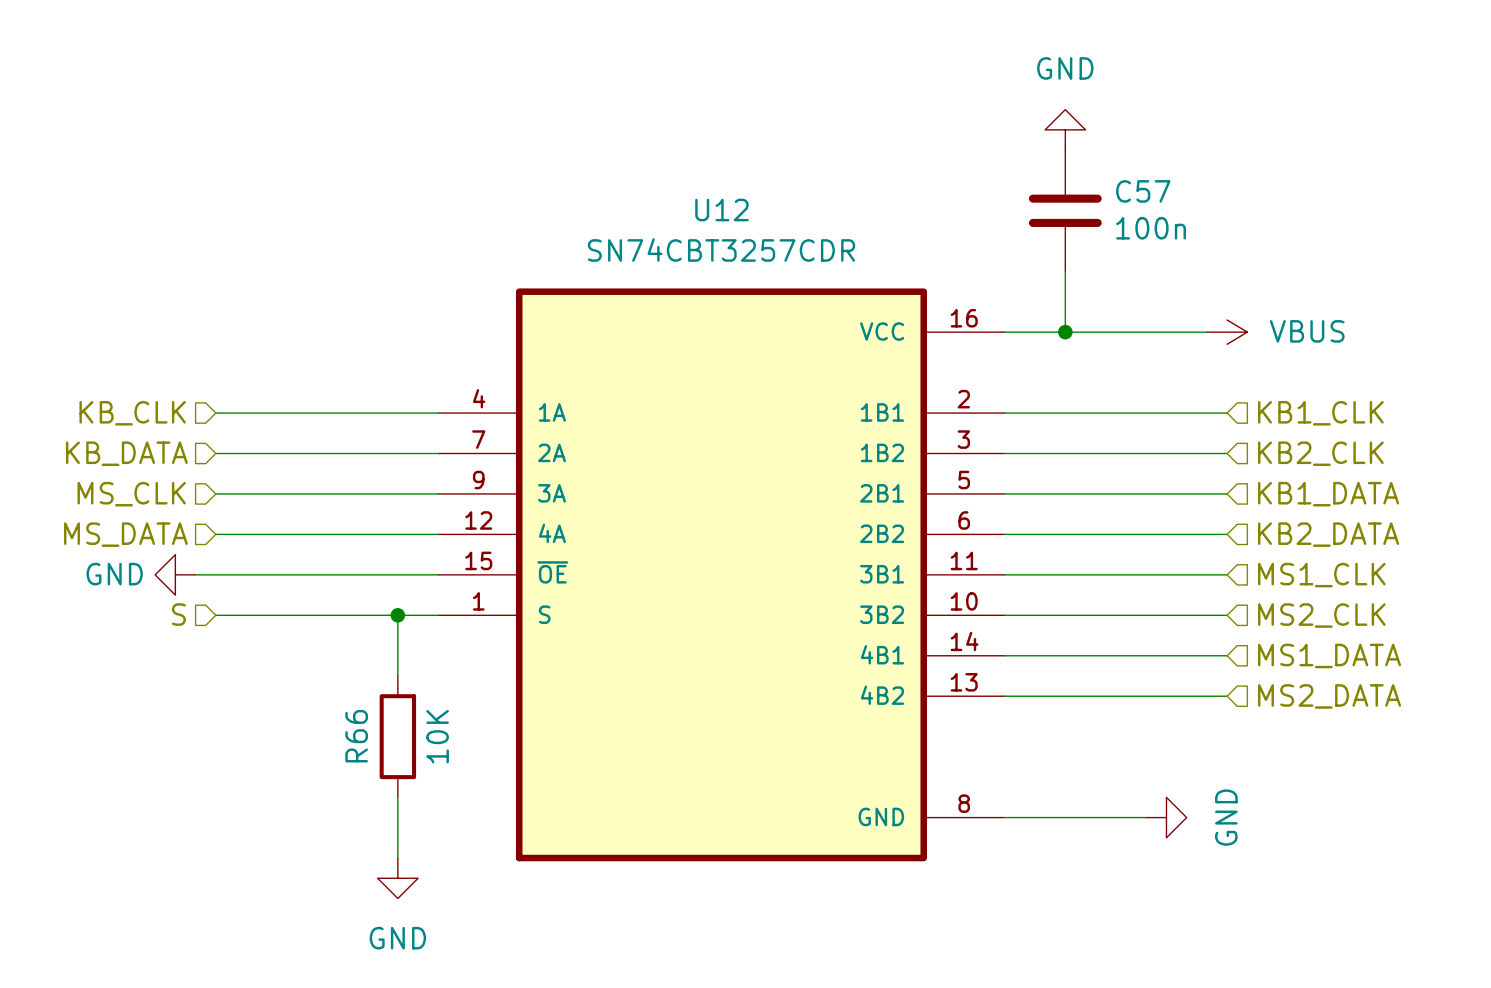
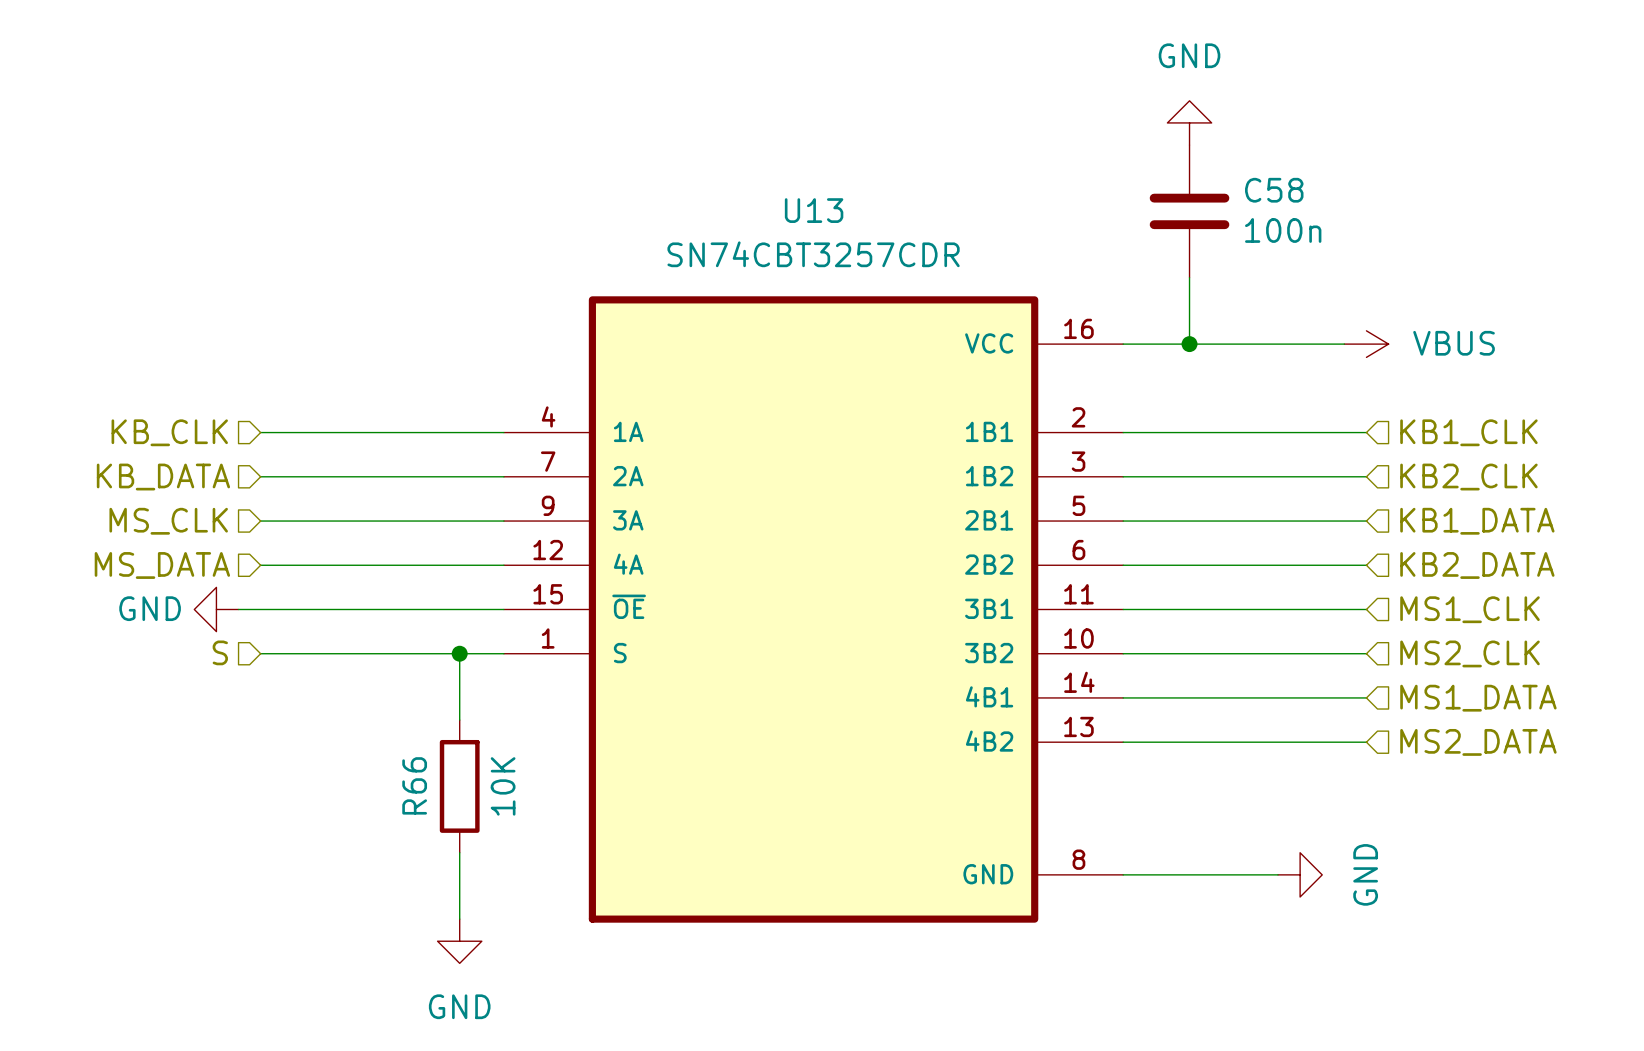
C57 name: C57 (1143, 191) -> C58 (1274, 190)
U12 name: U12 (721, 210) -> U13 (814, 210)

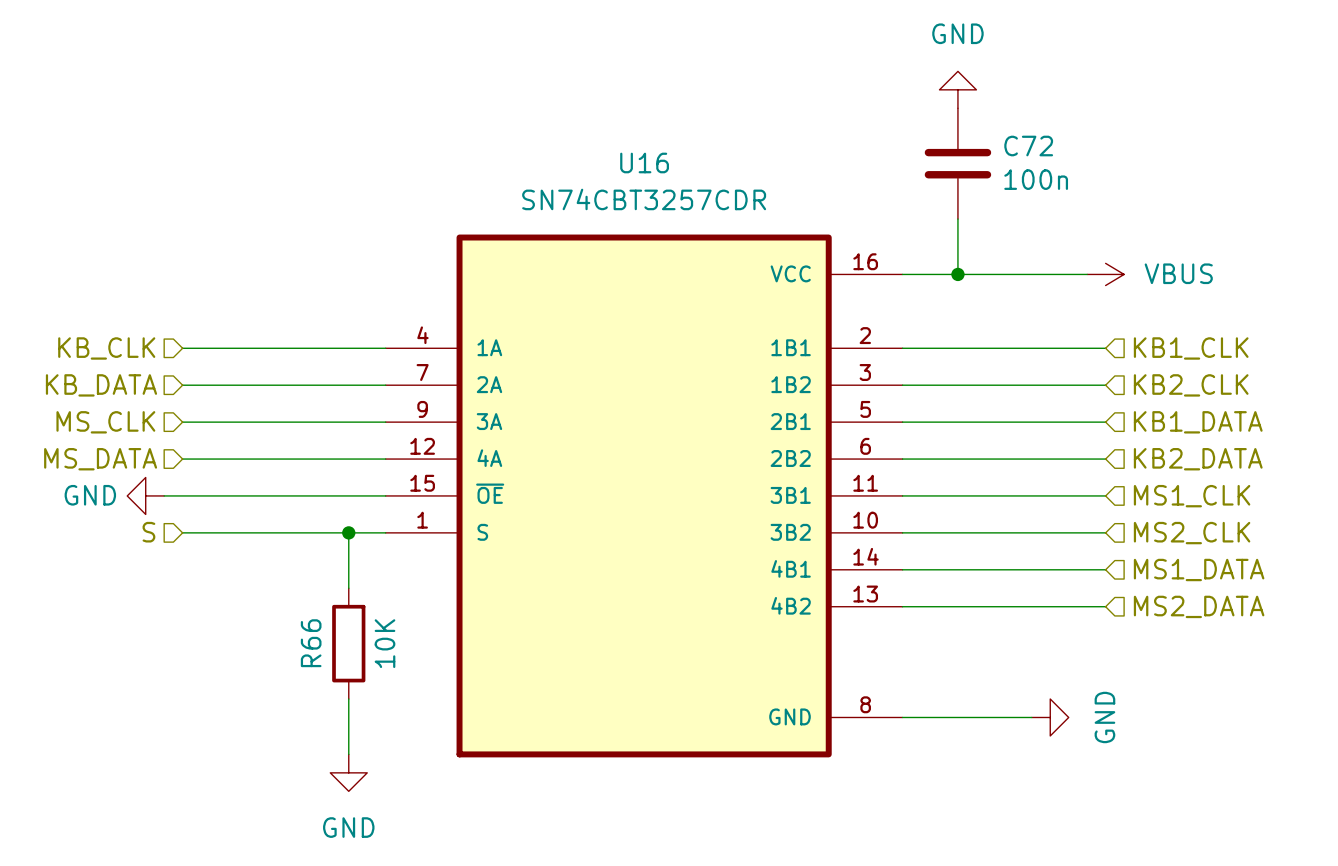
C58 name: C58 (1274, 190) -> C72 (1028, 146)
U13 name: U13 (814, 210) -> U16 (644, 162)

